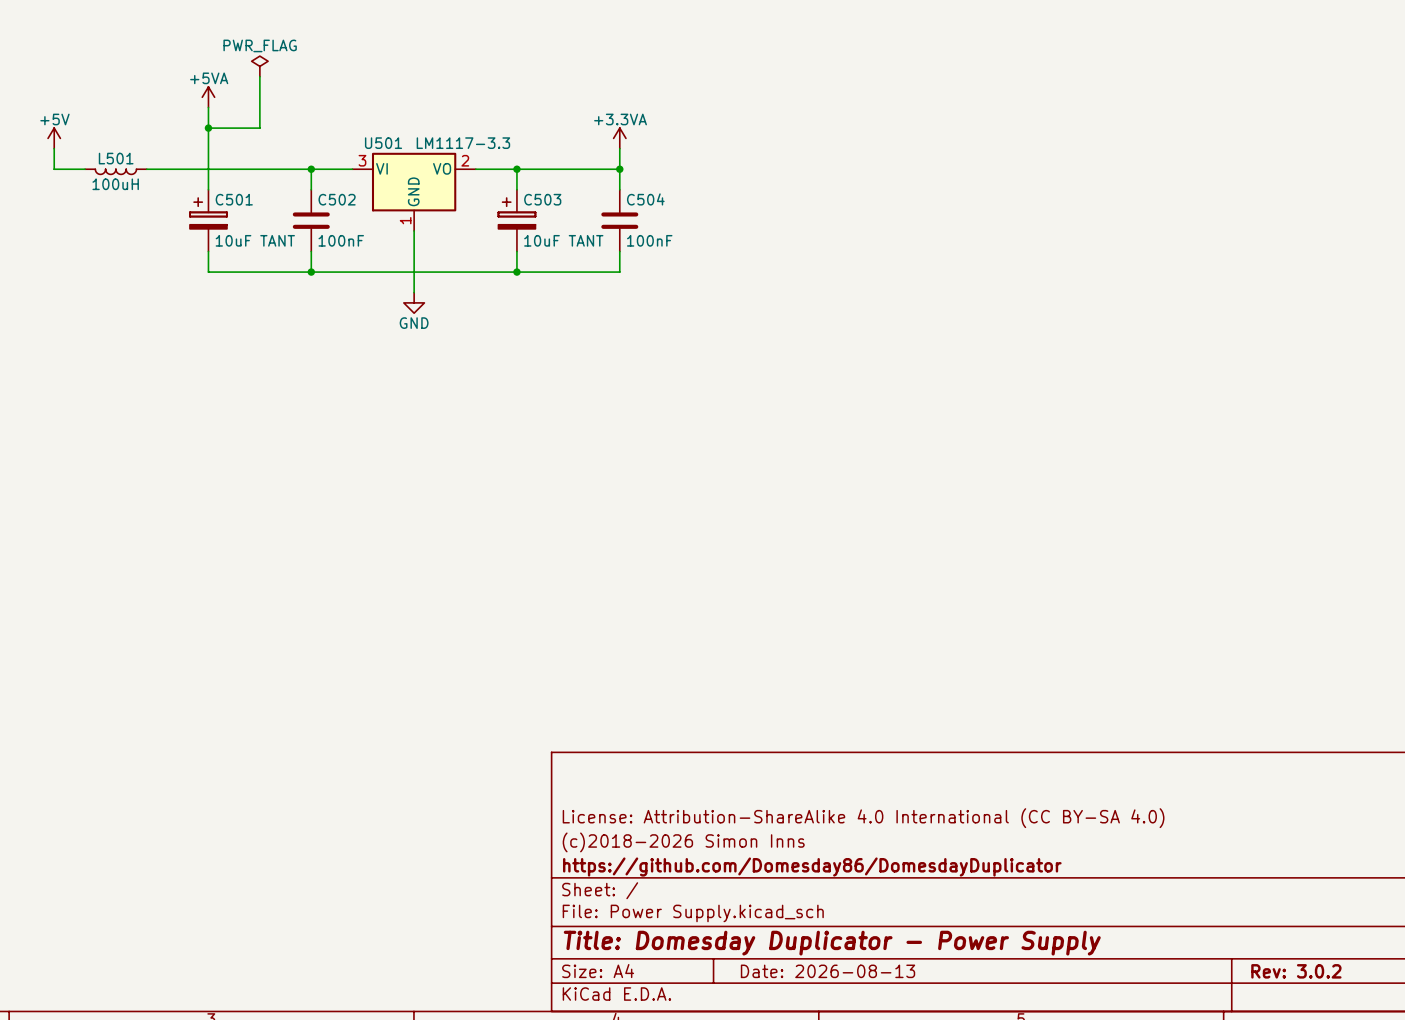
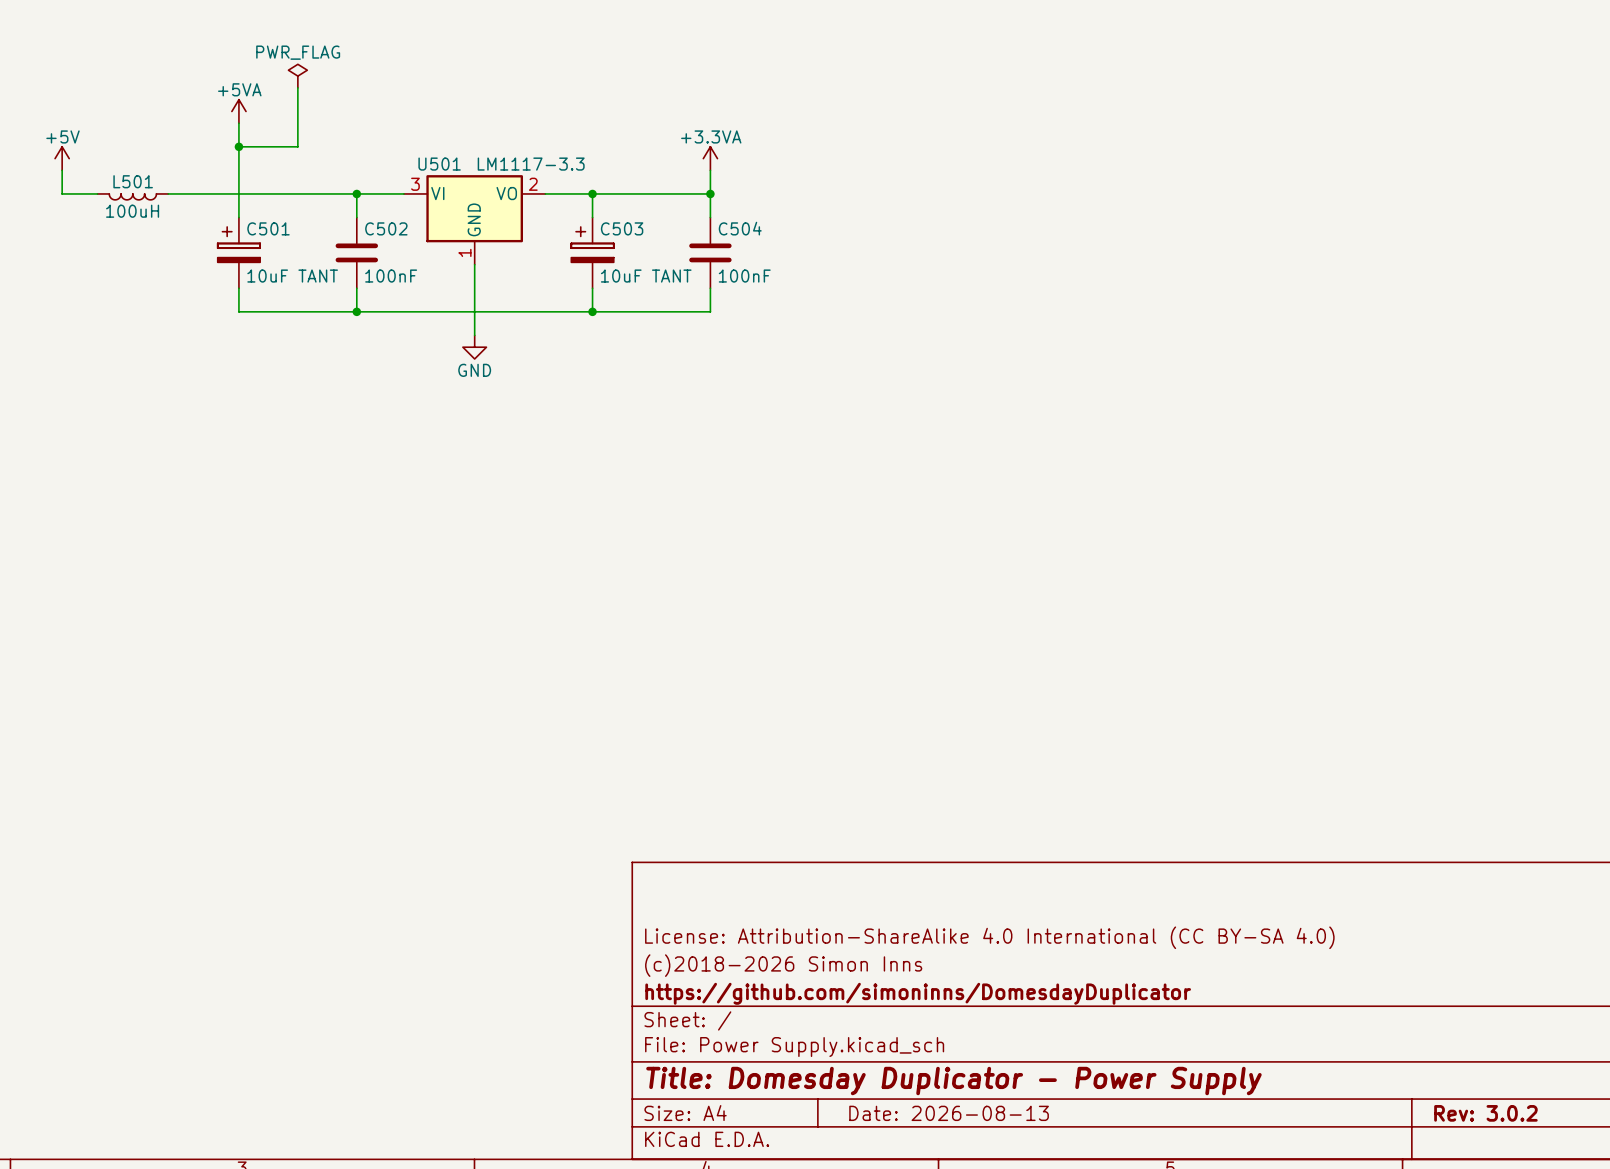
title block: https://github.com/Domesday86/DomesdayDuplicator (812, 867) -> https://github.com/simoninns/DomesdayDuplicator (918, 993)

